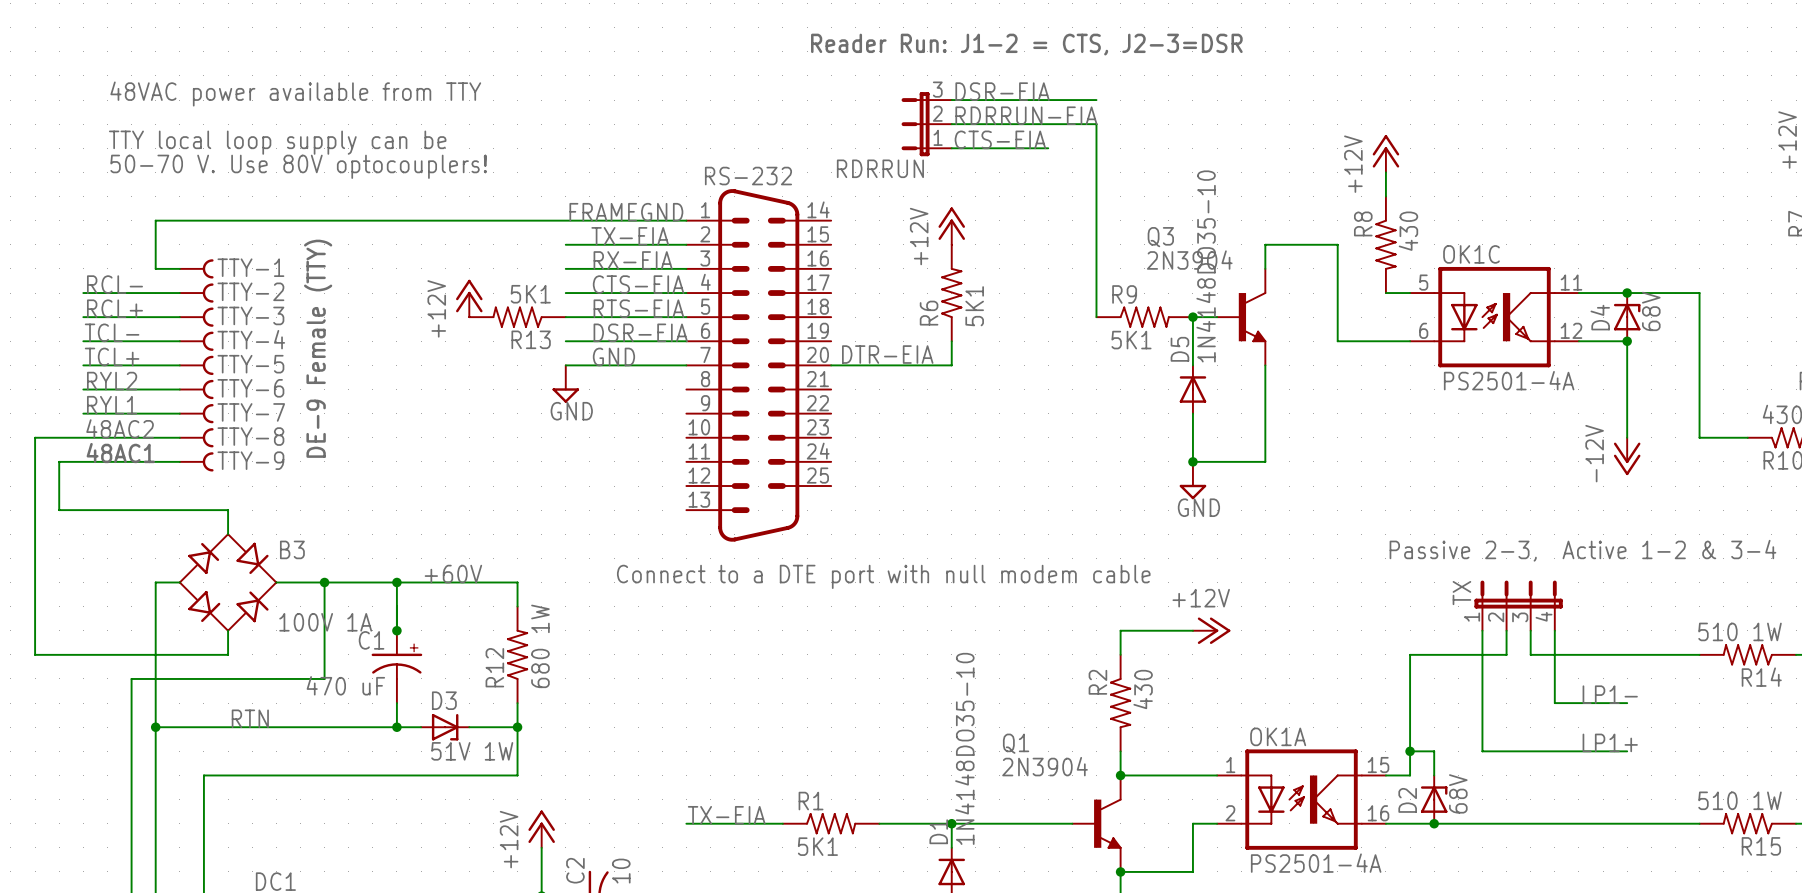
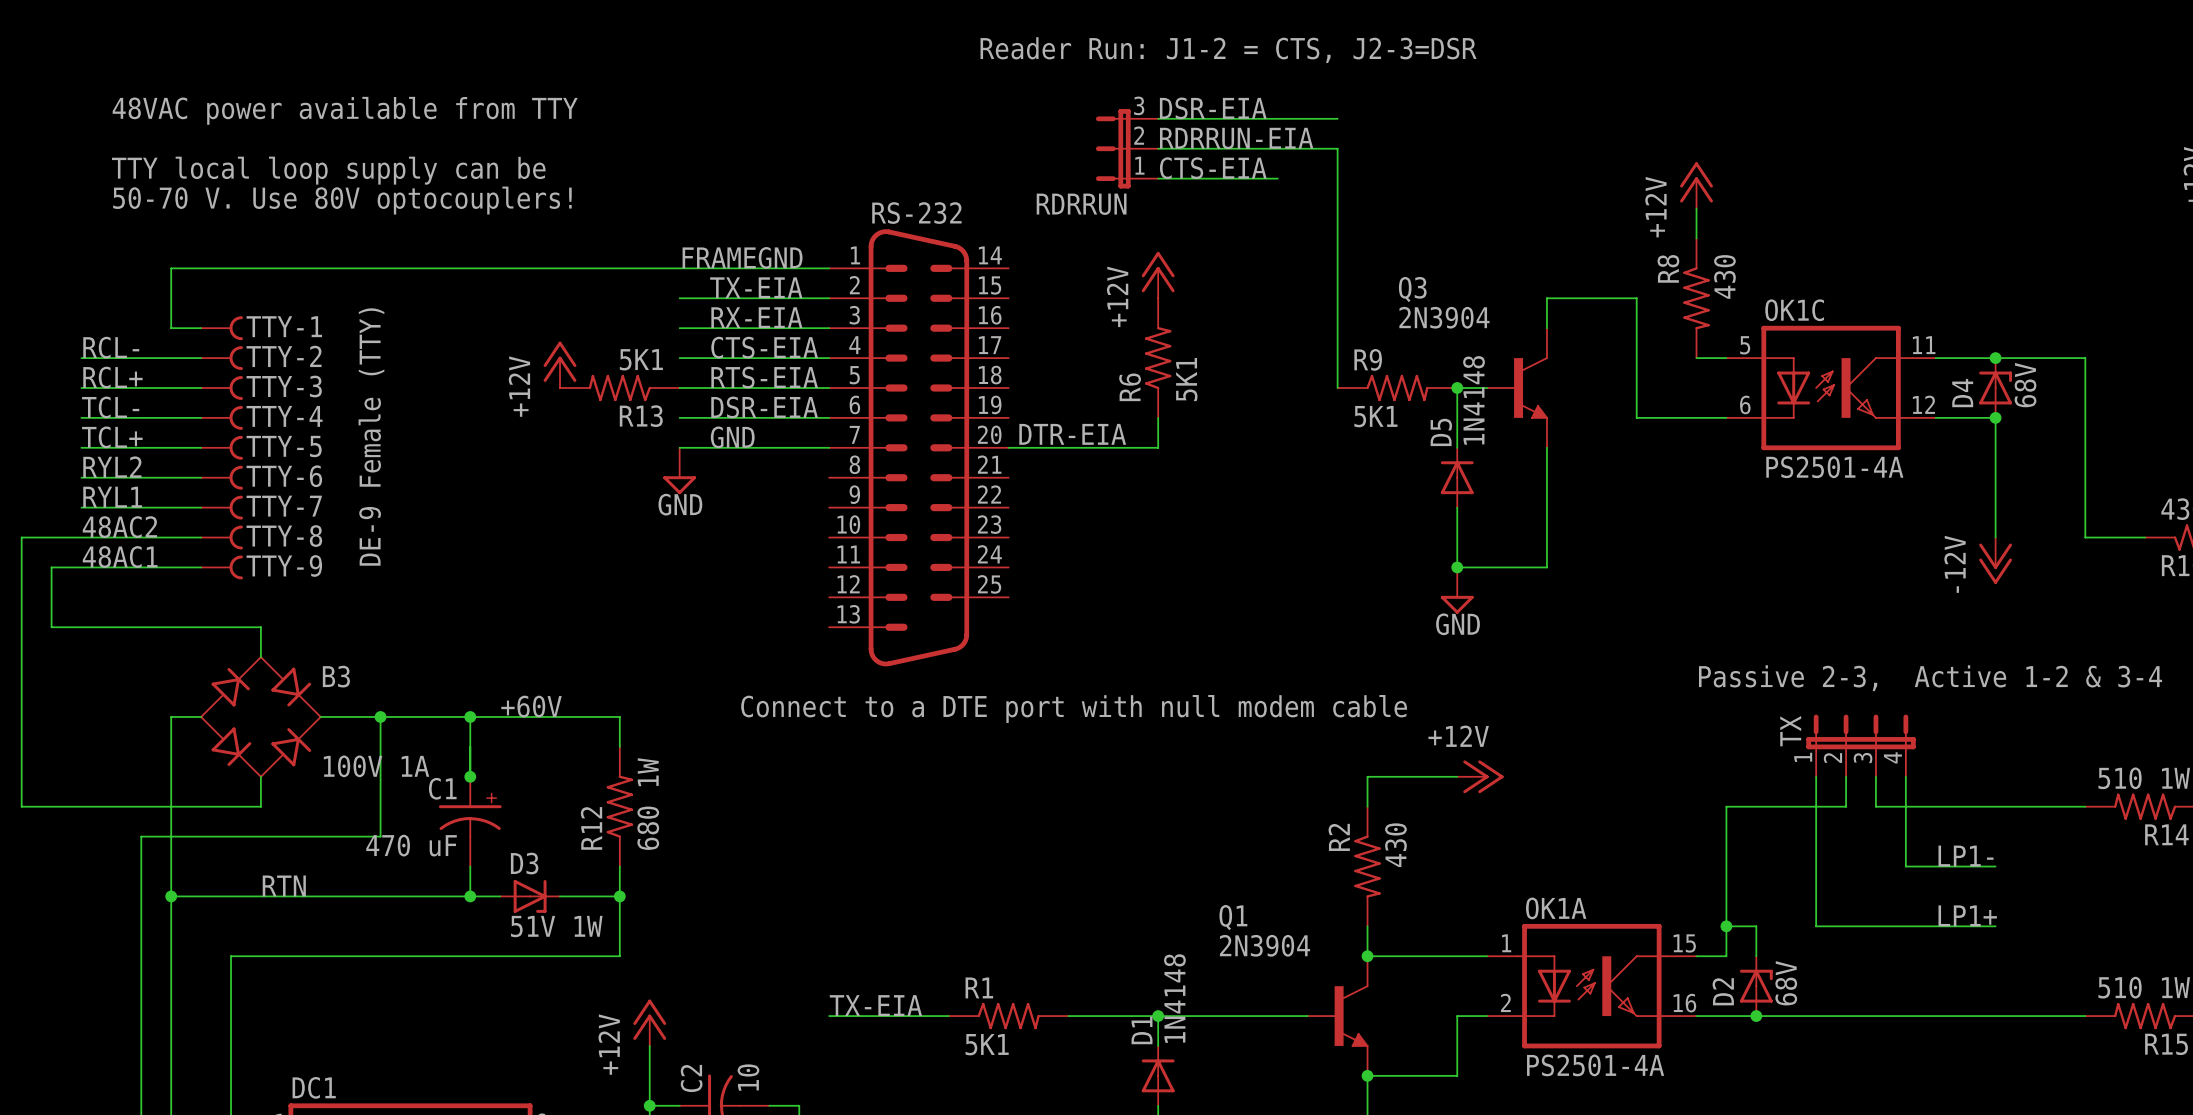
D5 value: 1N4148DO35-10 (1206, 266) -> 1N4148 (1474, 400)
D1 value: 1N4148DO35-10 (964, 748) -> 1N4148 (1174, 998)

